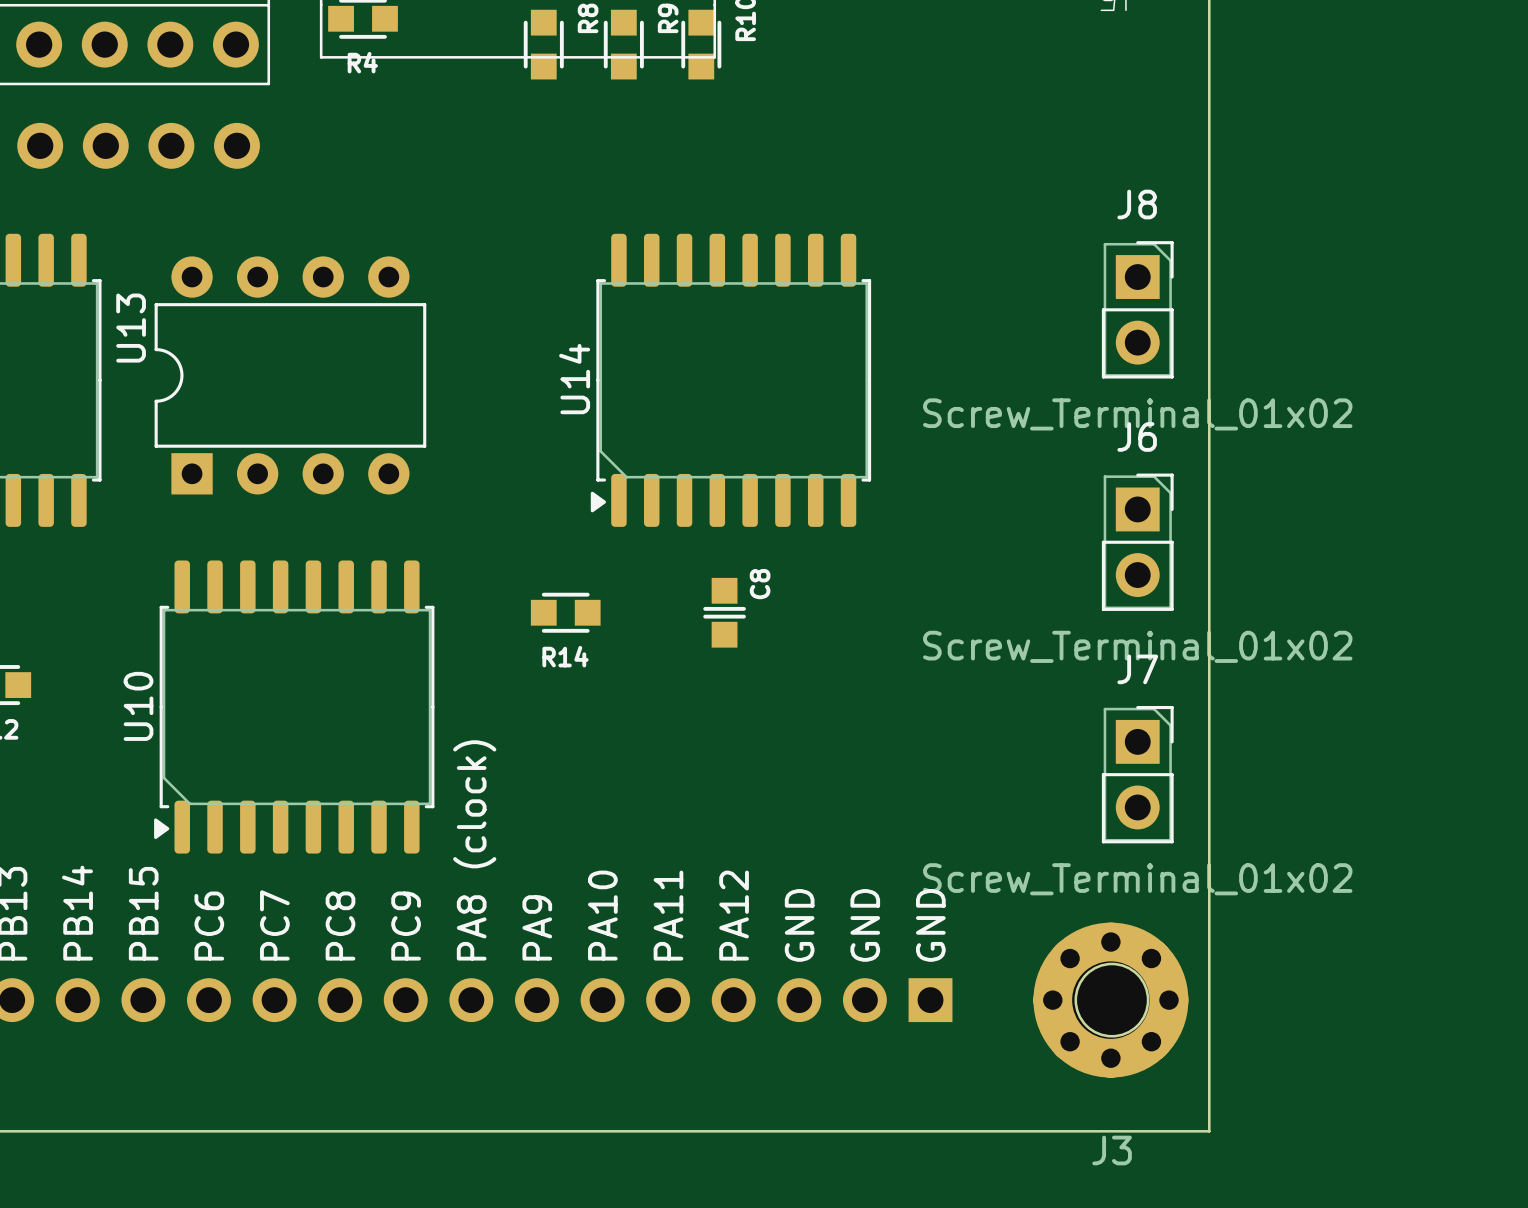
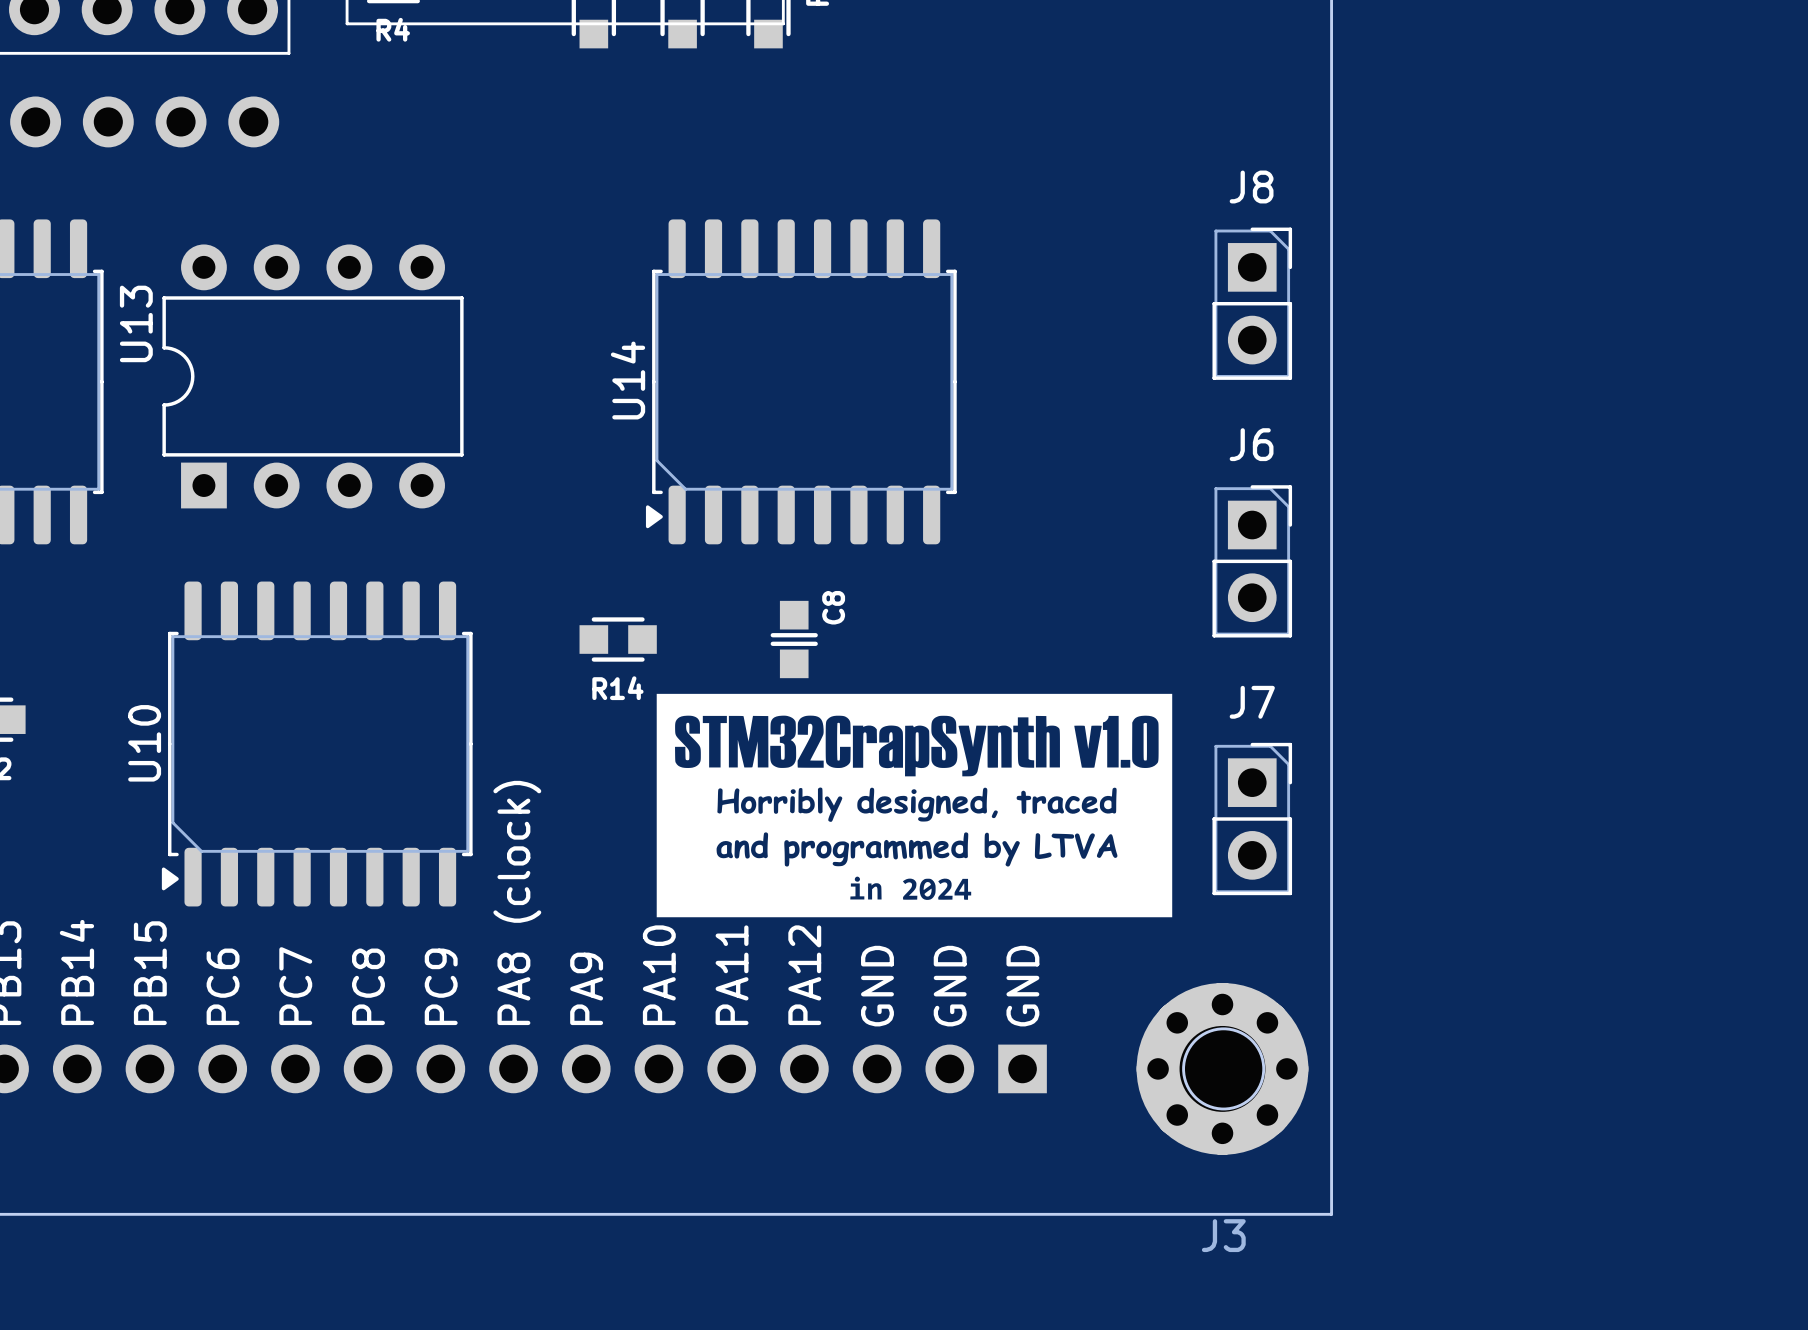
J8 value: Screw_Terminal_01x02 (1137, 414) -> none
J6 value: Screw_Terminal_01x02 (1137, 646) -> none
drawing: none -> [656, 693, 1173, 918]
J7 value: Screw_Terminal_01x02 (1137, 879) -> none

